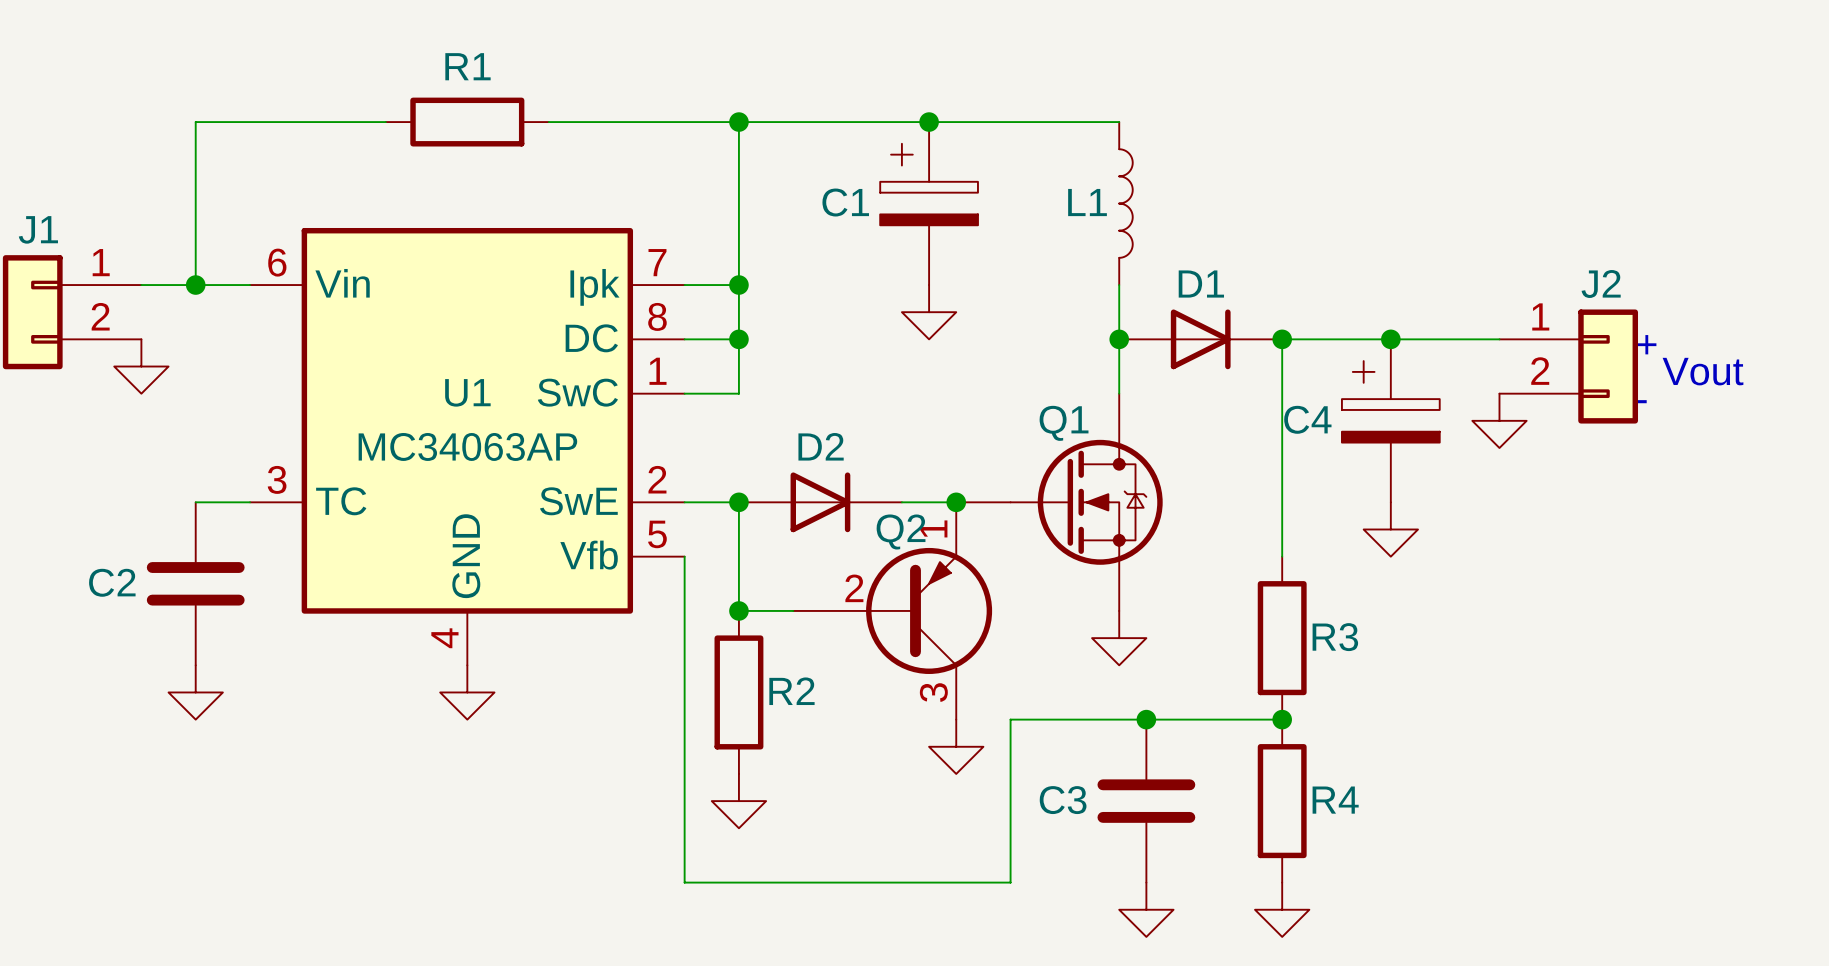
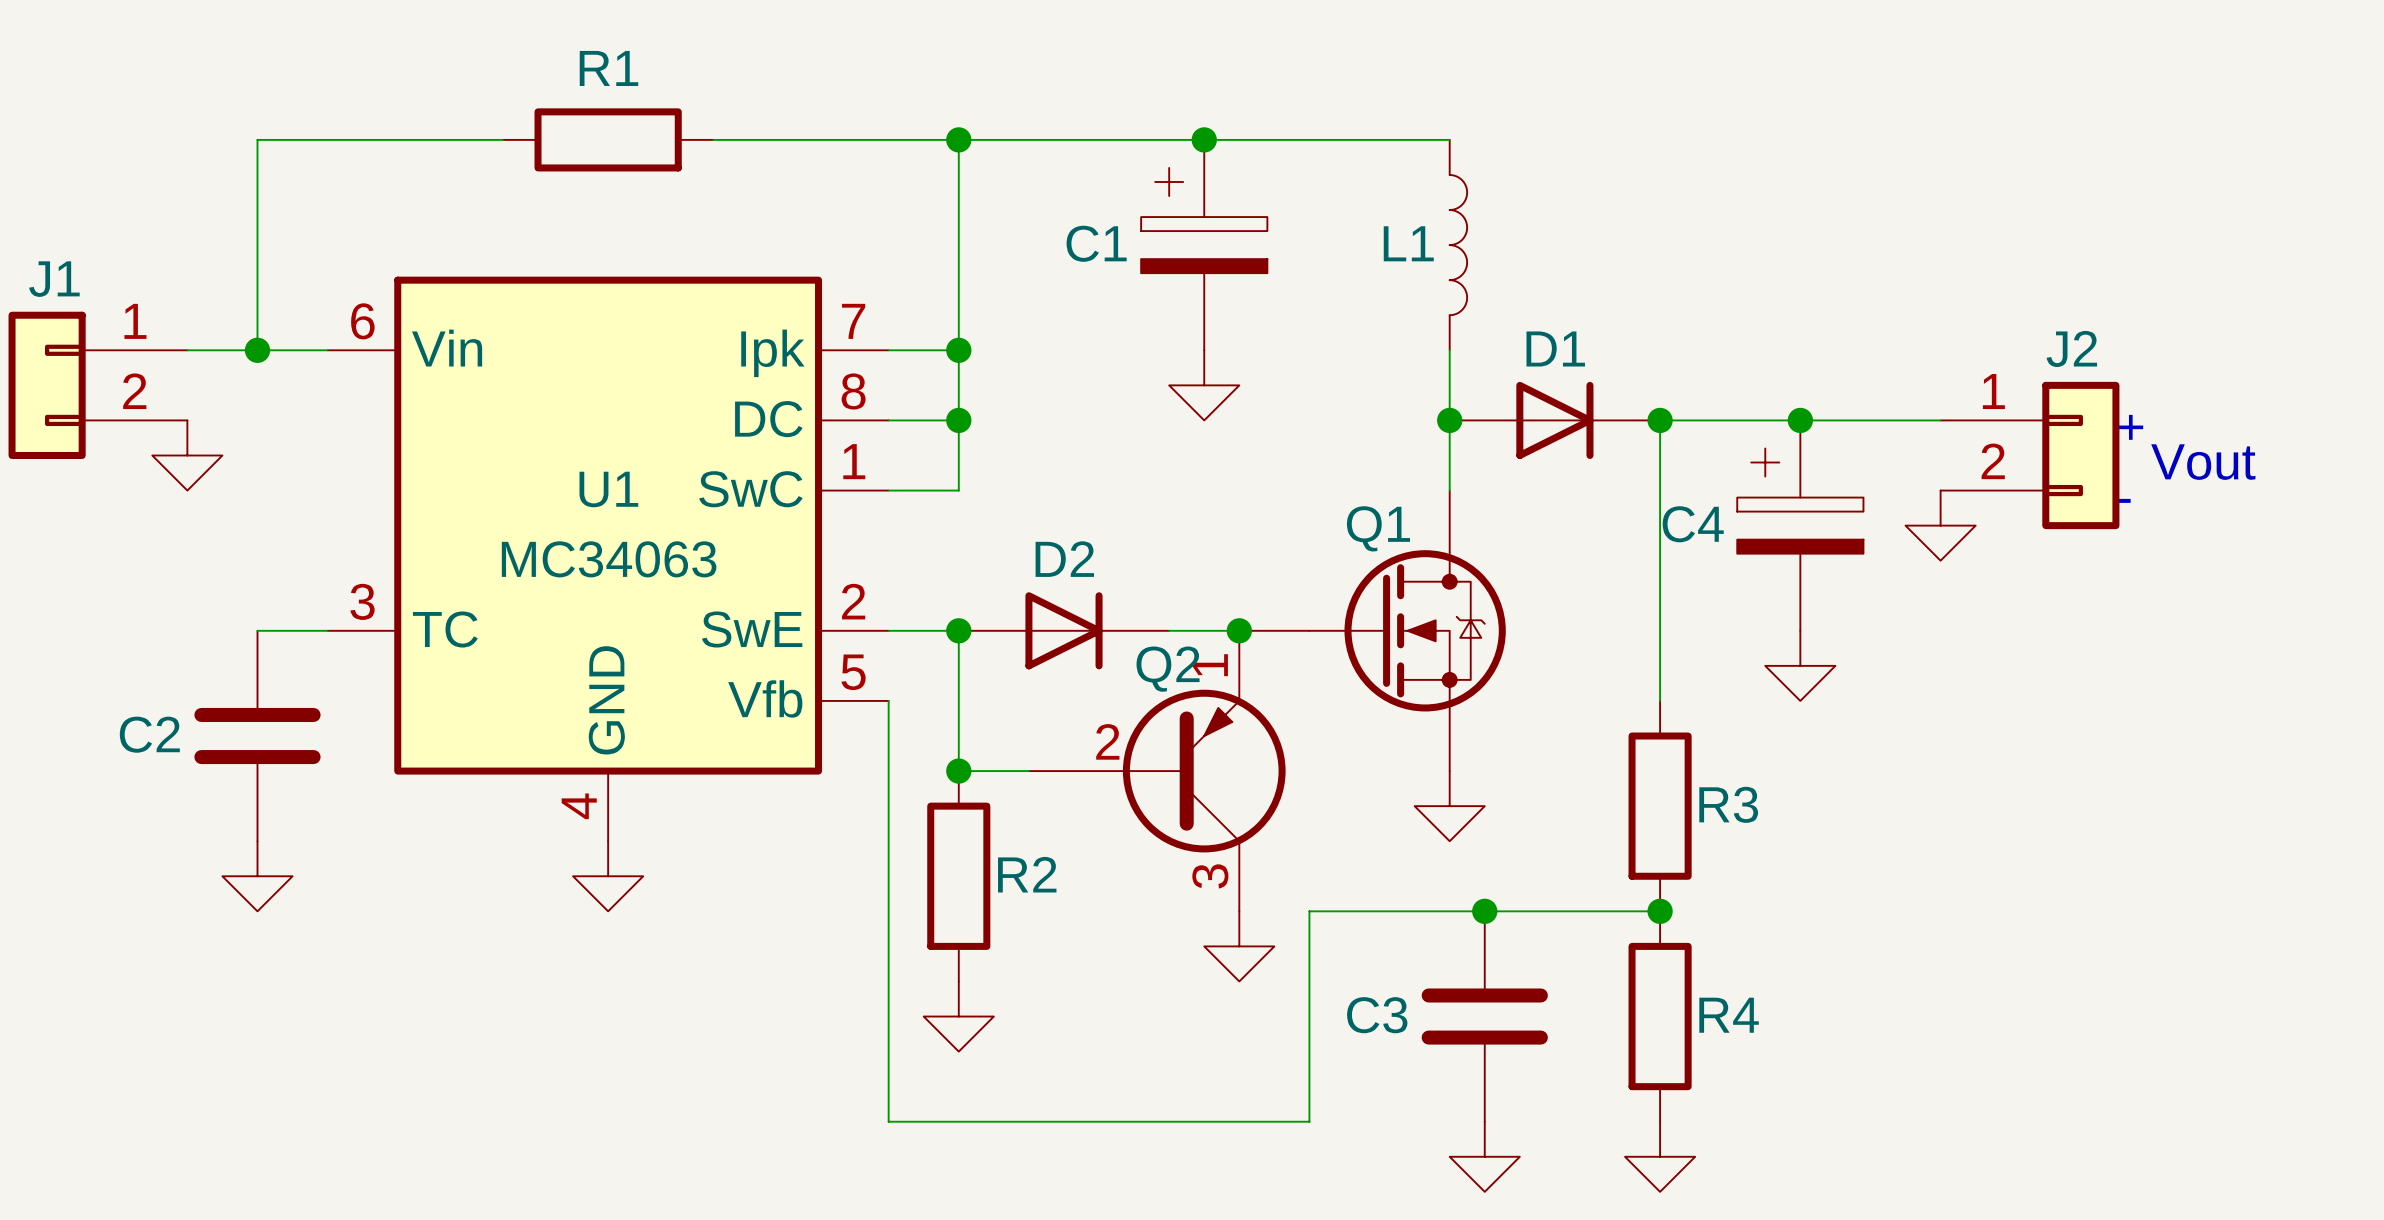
U1 value: MC34063AP (467, 446) -> MC34063 (609, 559)

